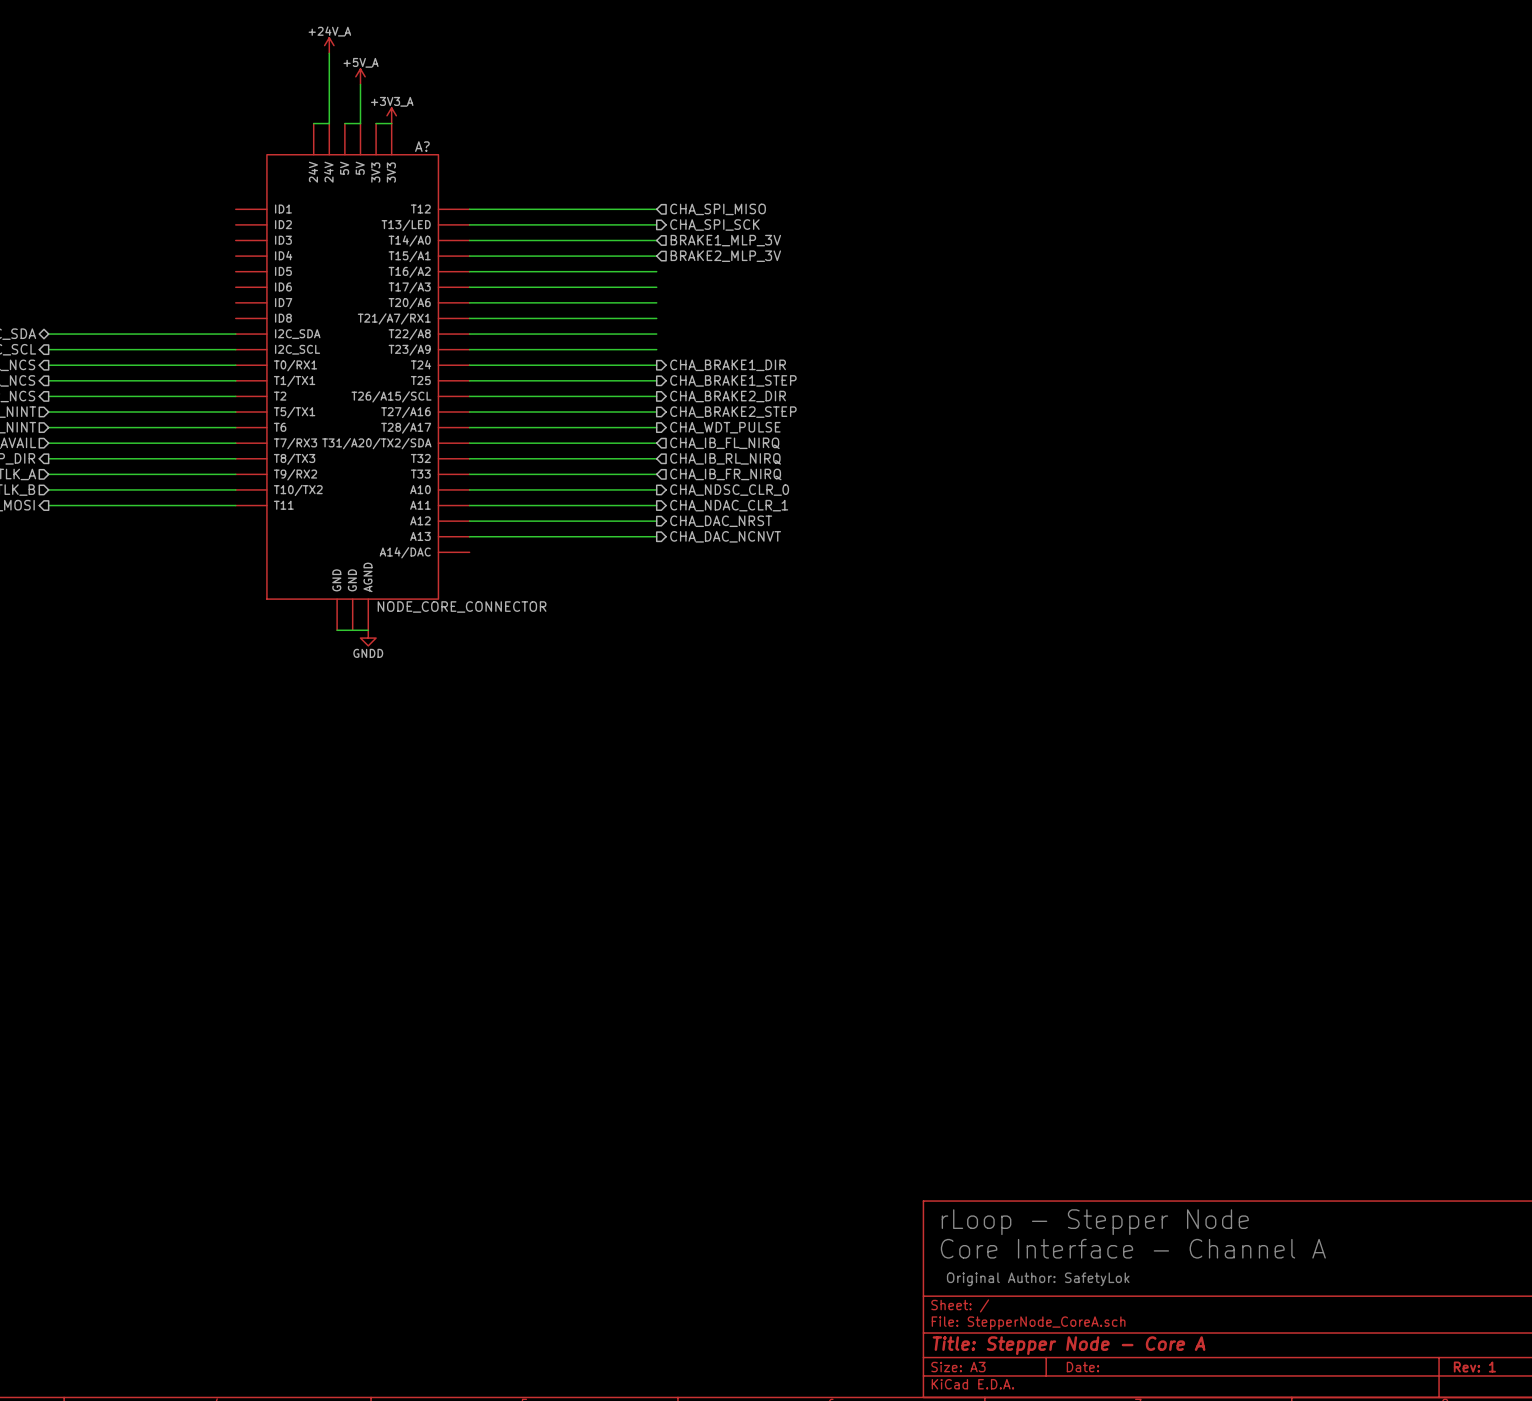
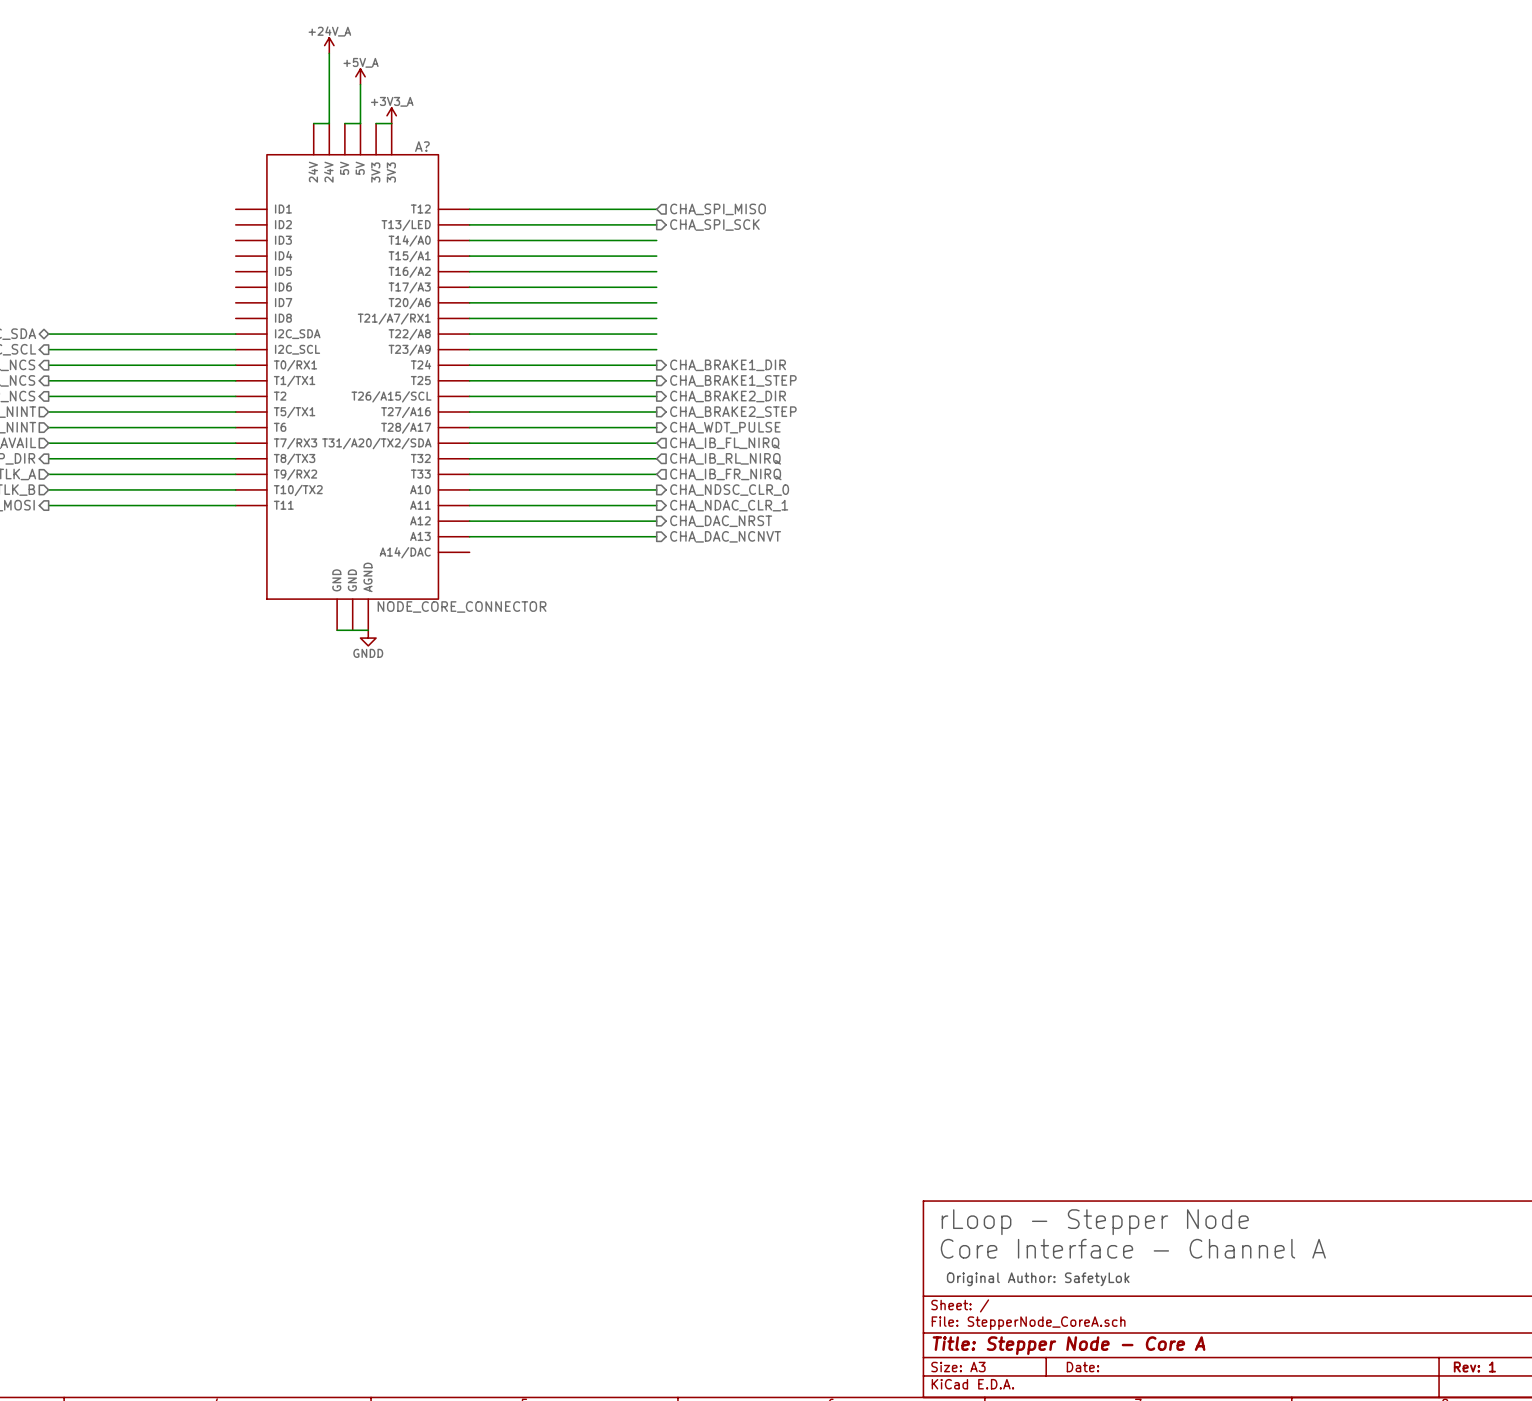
hierarchical label: BRAKE1_MLP_3V (725, 240) -> none
hierarchical label: BRAKE2_MLP_3V (725, 256) -> none

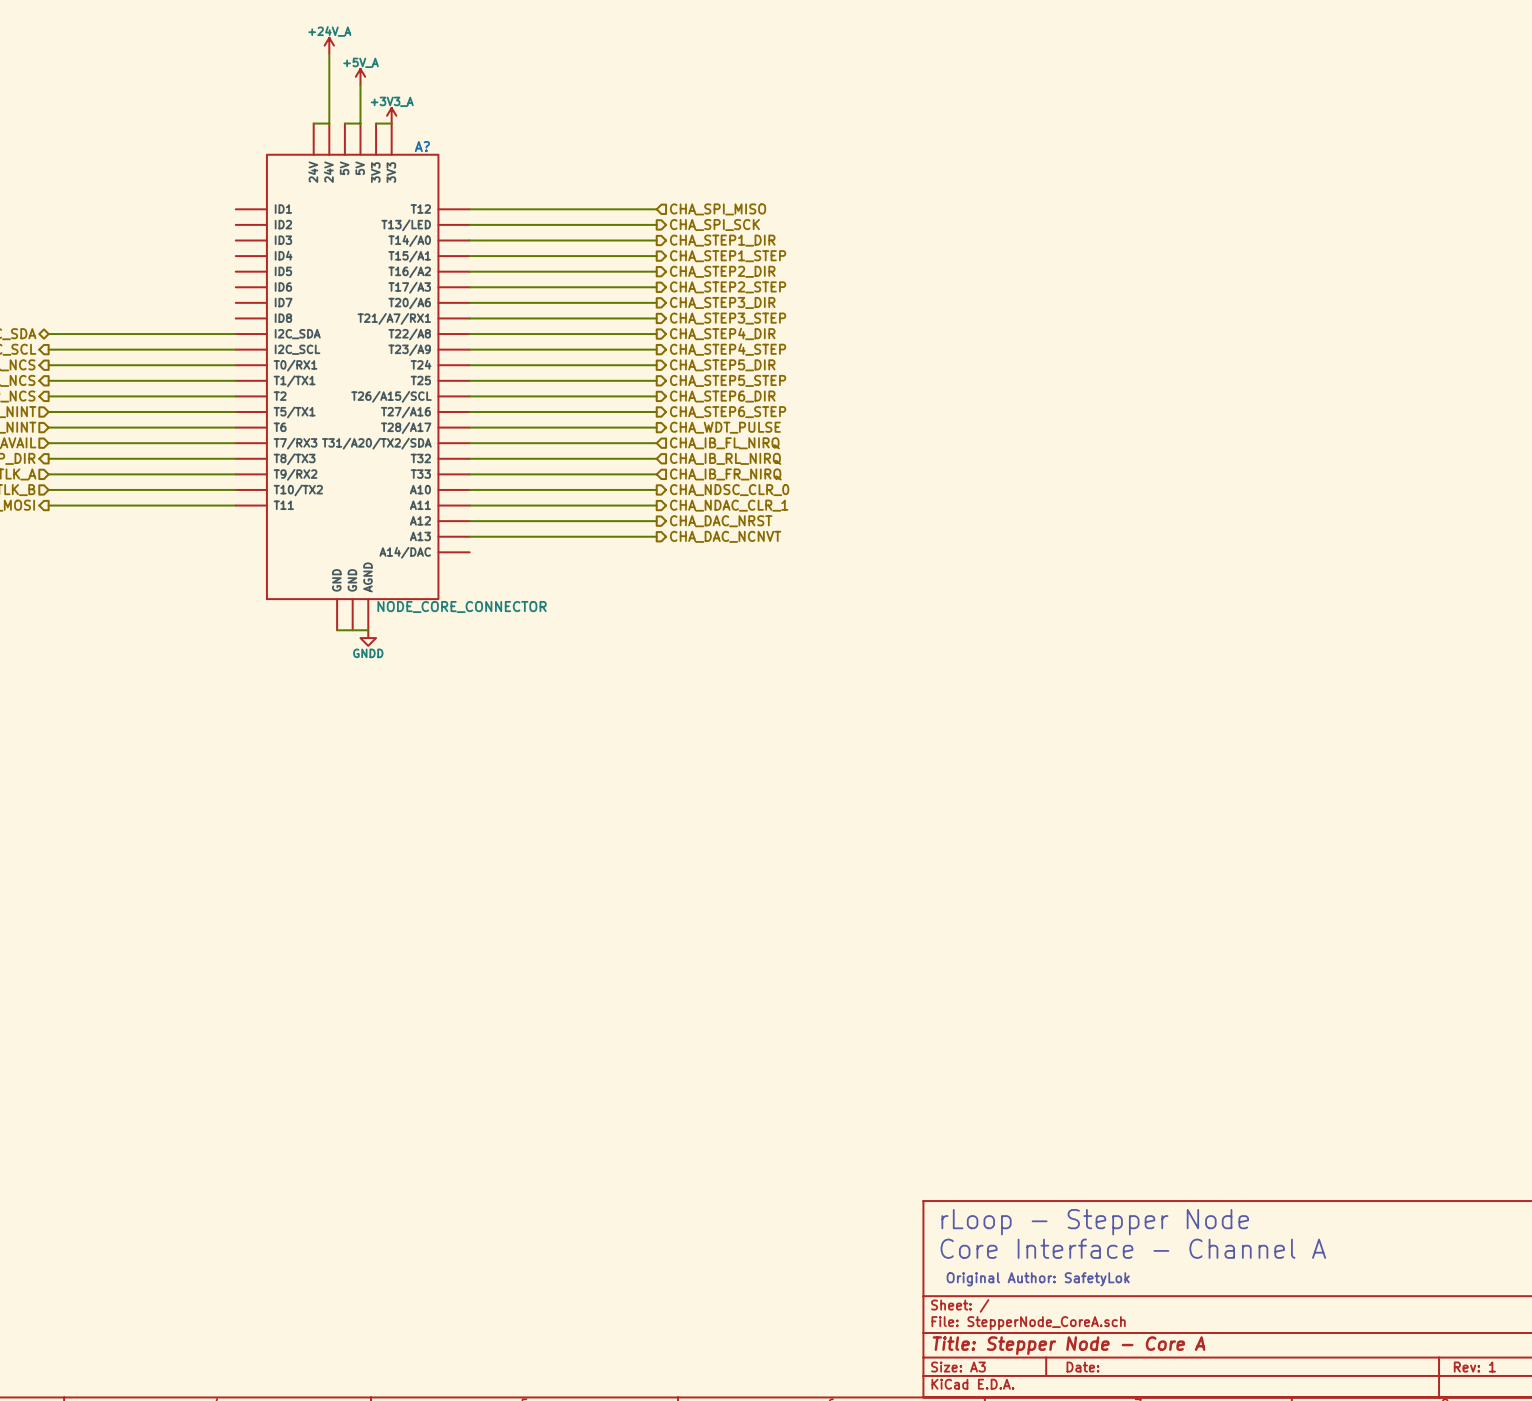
hierarchical label: none -> CHA_STEP1_DIR (722, 240)
hierarchical label: none -> CHA_STEP1_STEP (728, 256)
hierarchical label: none -> CHA_STEP2_DIR (722, 271)
hierarchical label: none -> CHA_STEP2_STEP (728, 287)
hierarchical label: none -> CHA_STEP3_DIR (722, 302)
hierarchical label: none -> CHA_STEP3_STEP (728, 318)
hierarchical label: none -> CHA_STEP4_DIR (722, 333)
hierarchical label: none -> CHA_STEP4_STEP (728, 349)
hierarchical label: CHA_BRAKE1_DIR (728, 365) -> CHA_STEP5_DIR (722, 365)
hierarchical label: CHA_BRAKE1_STEP (733, 380) -> CHA_STEP5_STEP (728, 380)
hierarchical label: CHA_BRAKE2_DIR (728, 396) -> CHA_STEP6_DIR (722, 396)
hierarchical label: CHA_BRAKE2_STEP (733, 412) -> CHA_STEP6_STEP (728, 412)

